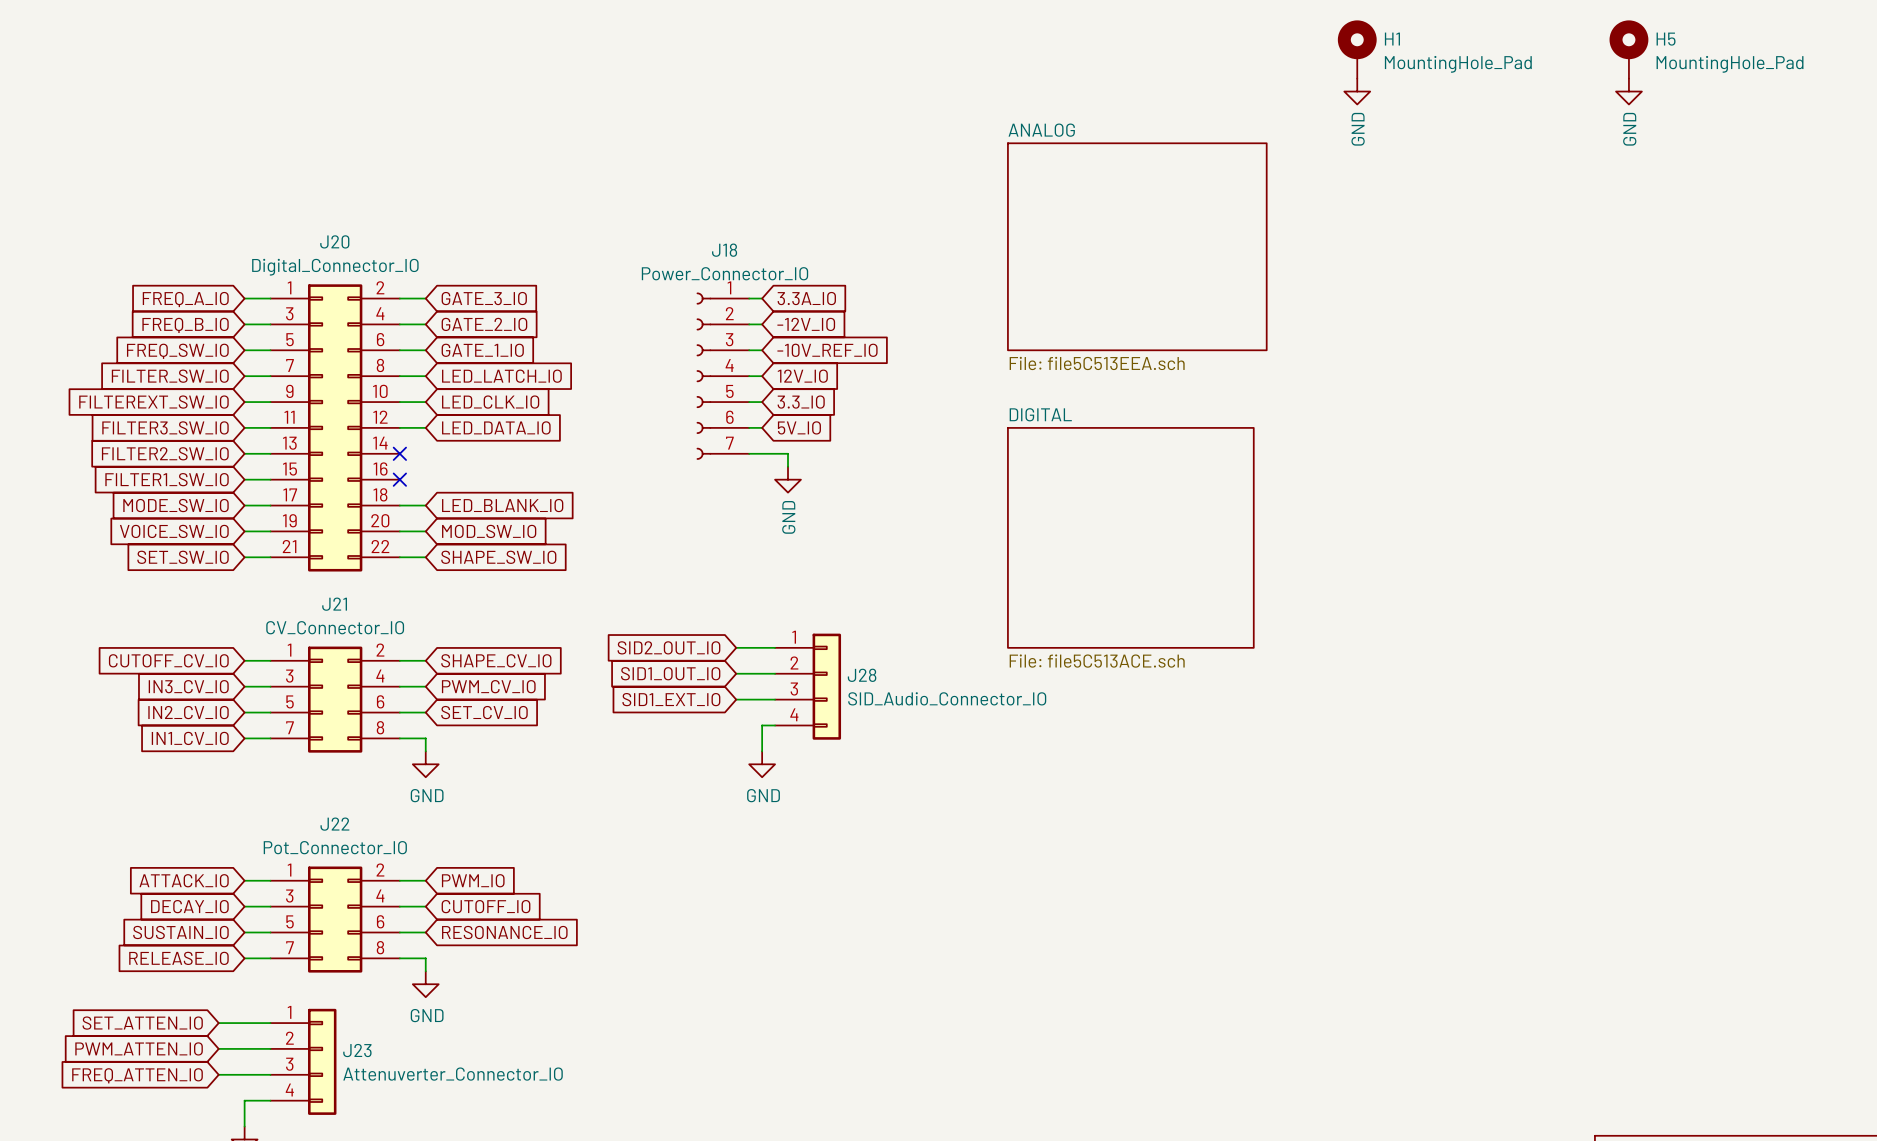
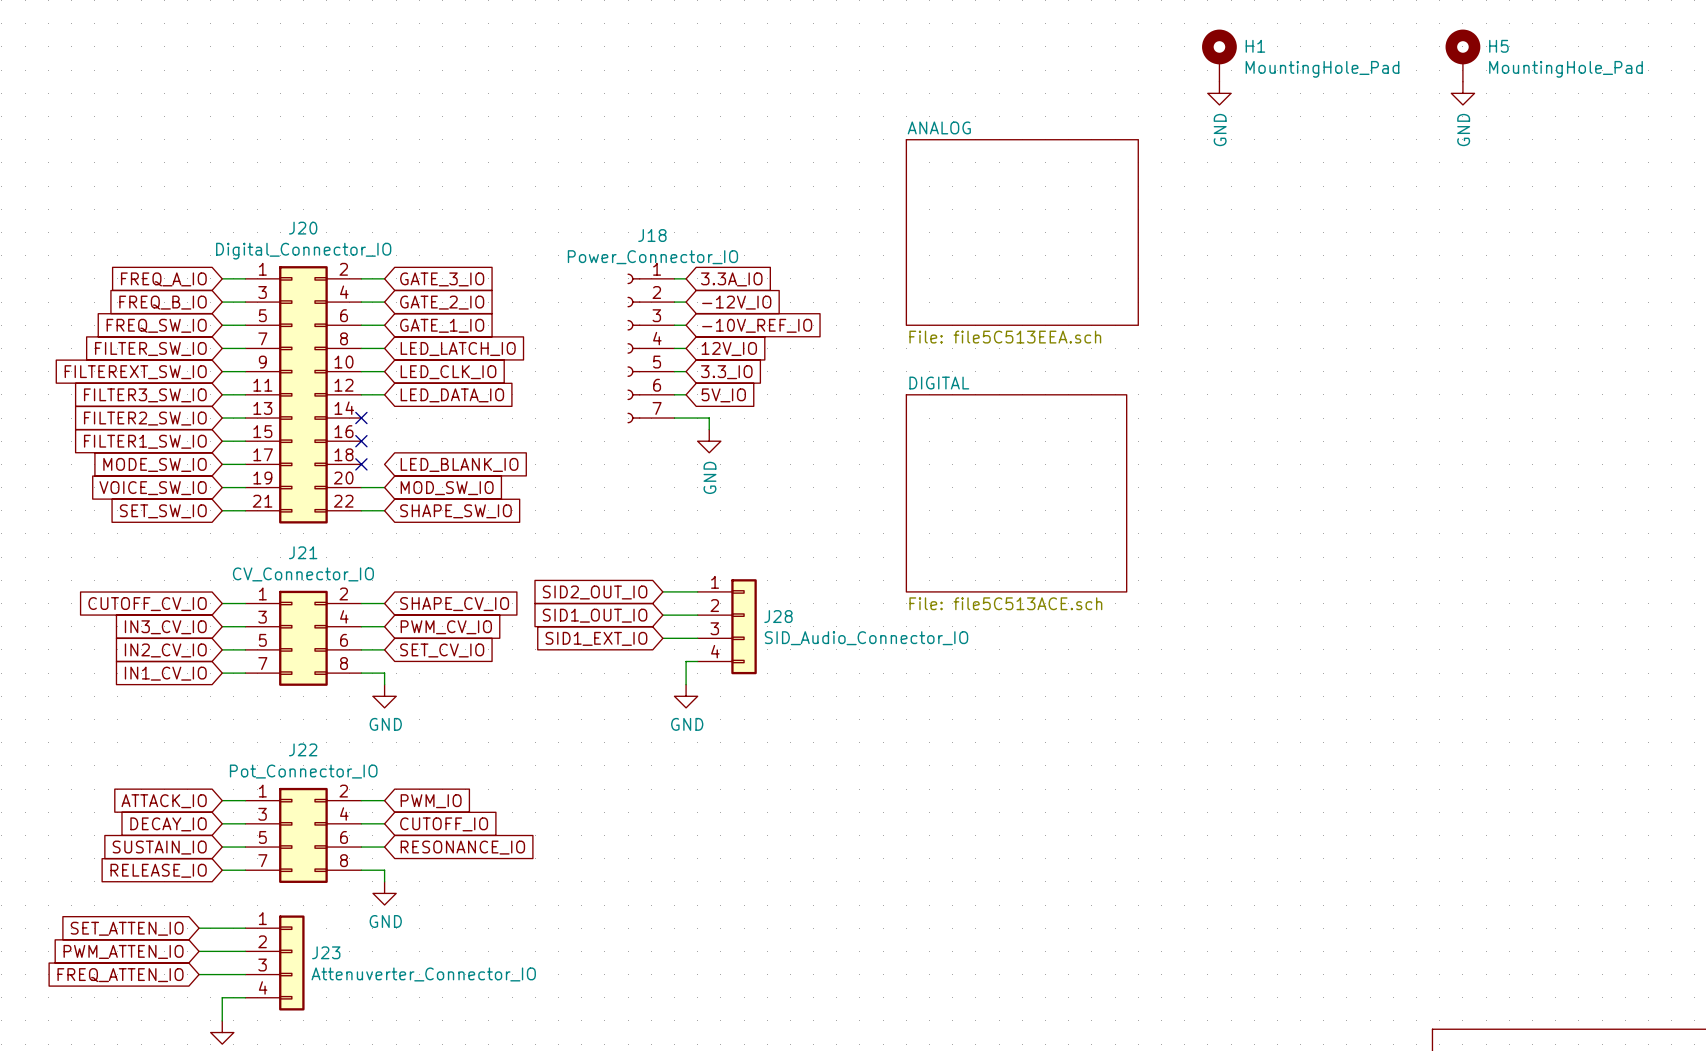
wire: (399, 505) (425, 505) -> none
no-connect mark: none -> (361, 464)

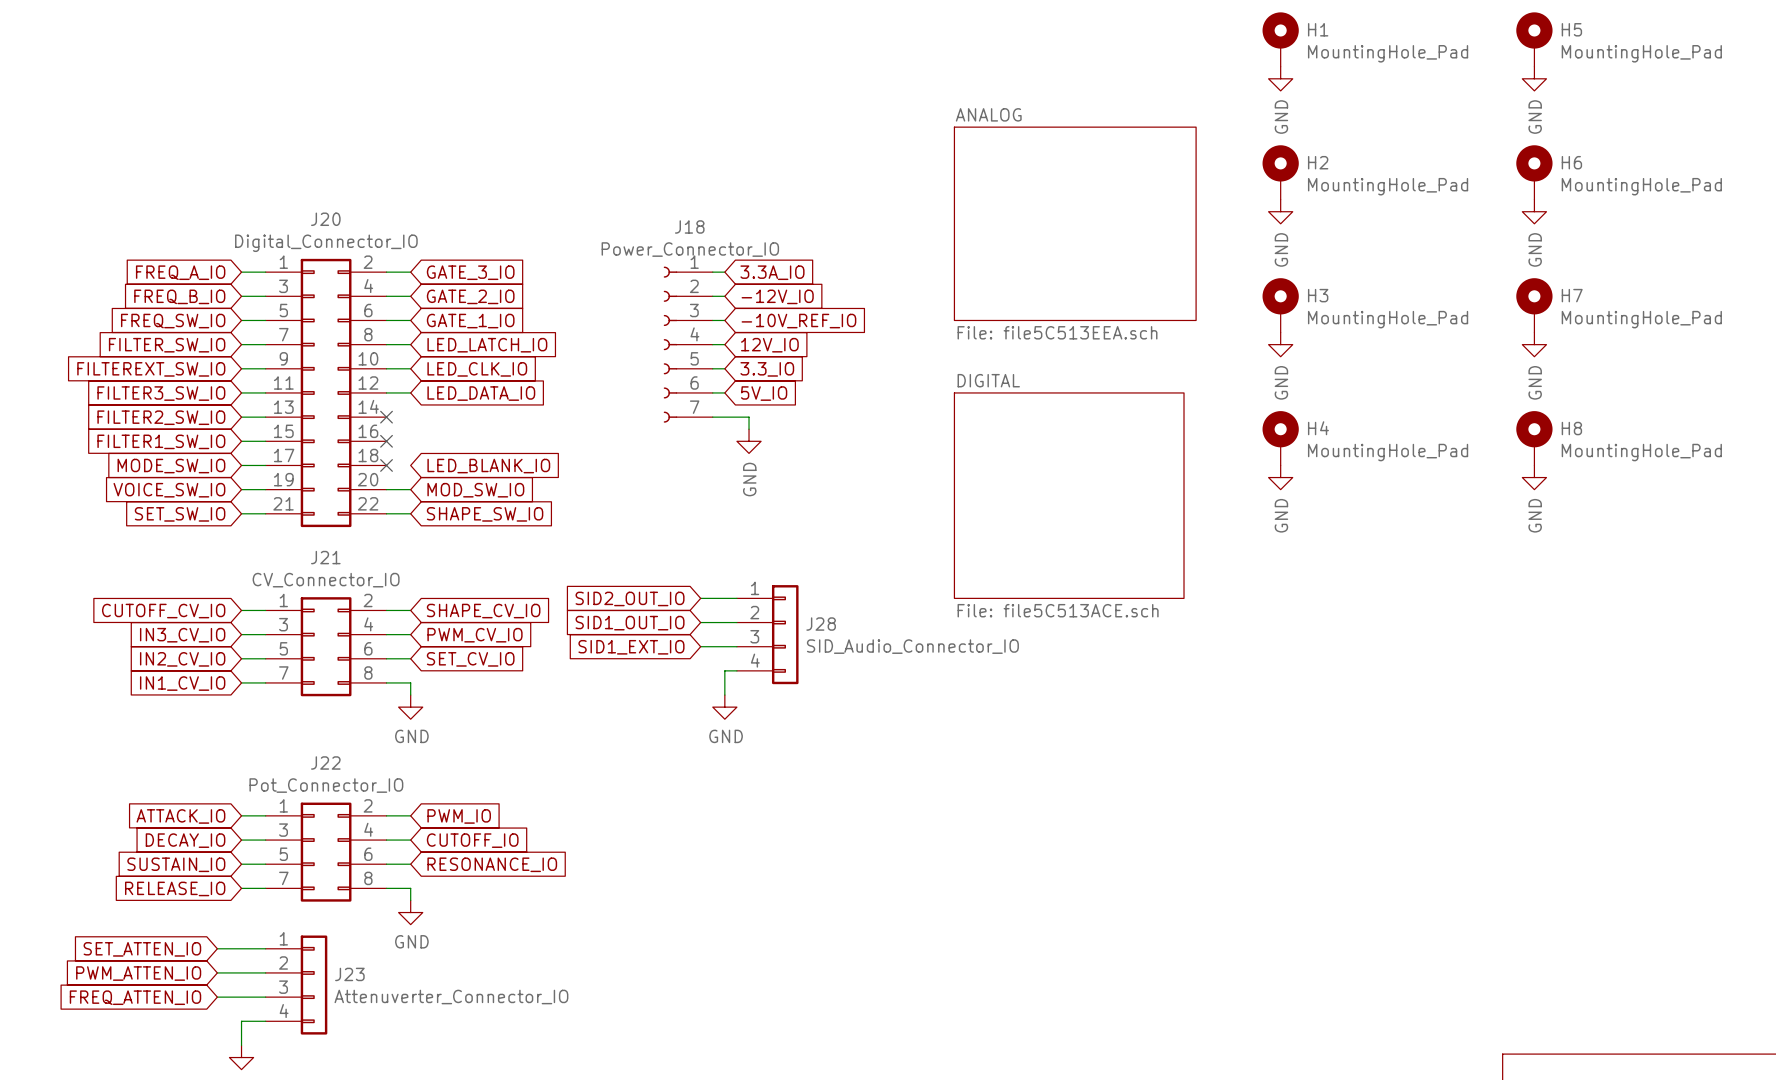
H2: none -> MountingHole_Pad (1280, 172)
H6: none -> MountingHole_Pad (1534, 172)
power symbol: none -> GND (1280, 211)
power symbol: none -> GND (1534, 211)
H3: none -> MountingHole_Pad (1280, 305)
H7: none -> MountingHole_Pad (1534, 305)
power symbol: none -> GND (1280, 344)
power symbol: none -> GND (1534, 344)
H4: none -> MountingHole_Pad (1280, 438)
H8: none -> MountingHole_Pad (1534, 438)
power symbol: none -> GND (1280, 477)
power symbol: none -> GND (1534, 477)

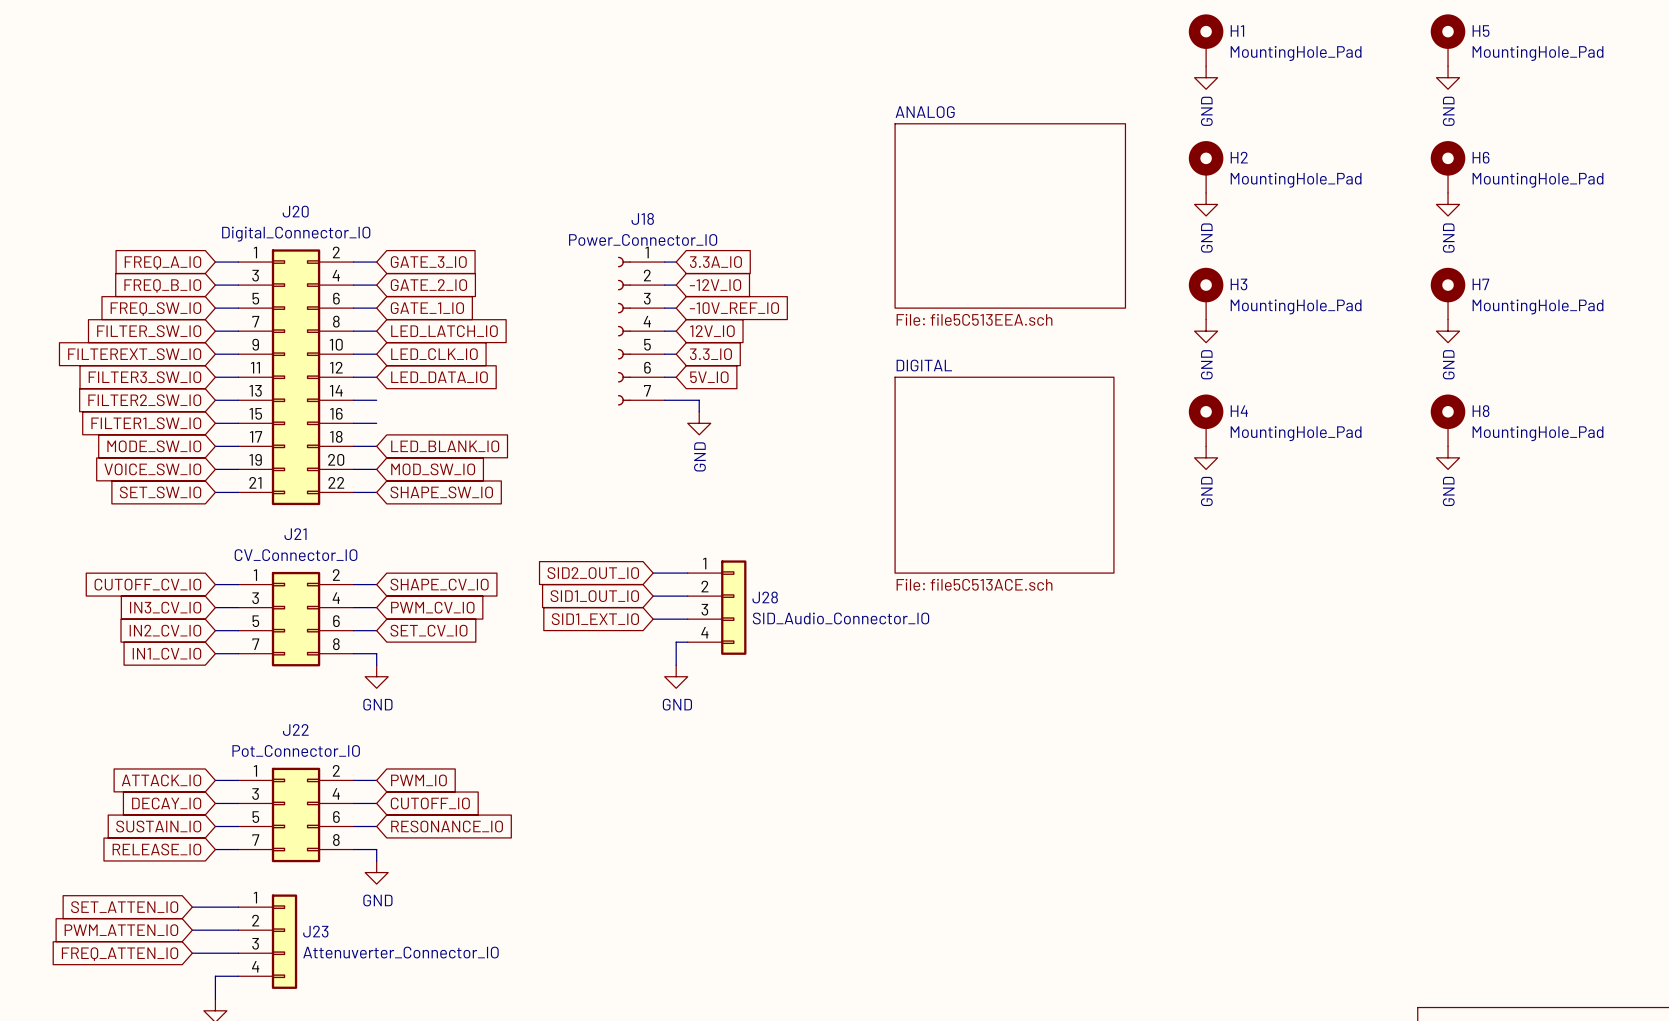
wire: none -> (353, 400) (376, 400)
no-connect mark: (386, 417) -> none
wire: none -> (353, 423) (376, 423)
no-connect mark: (386, 441) -> none
wire: none -> (353, 446) (376, 446)
no-connect mark: (386, 465) -> none

